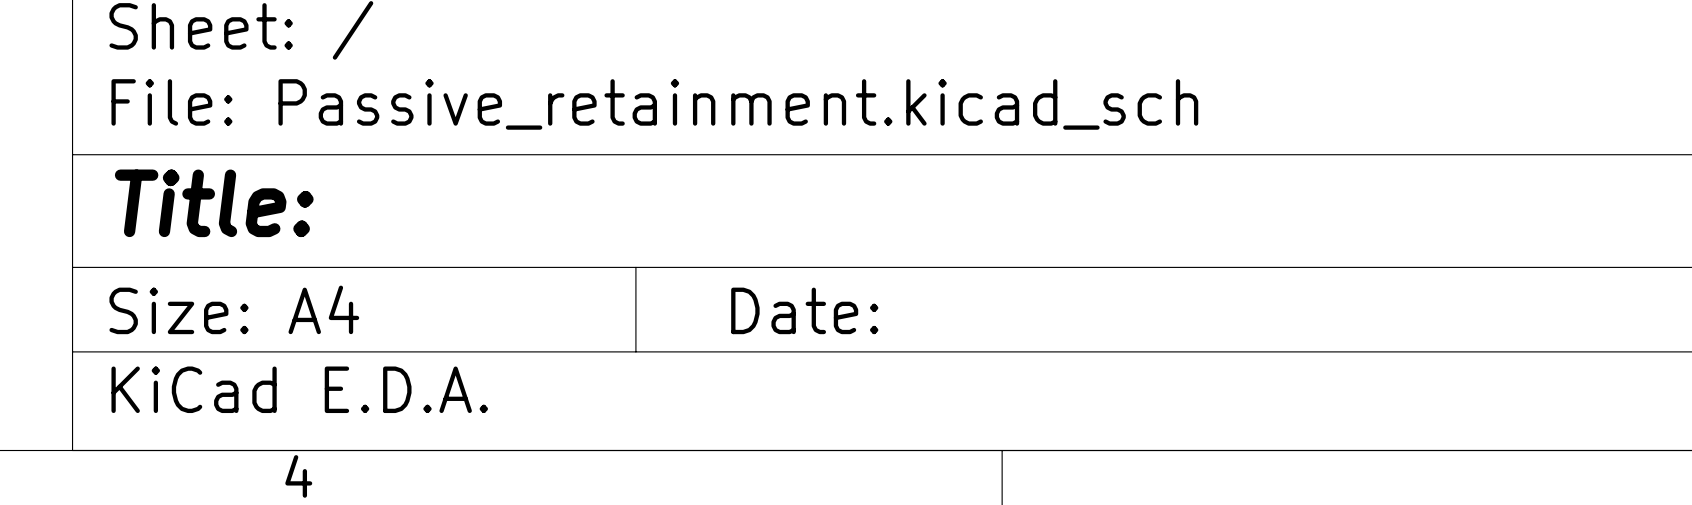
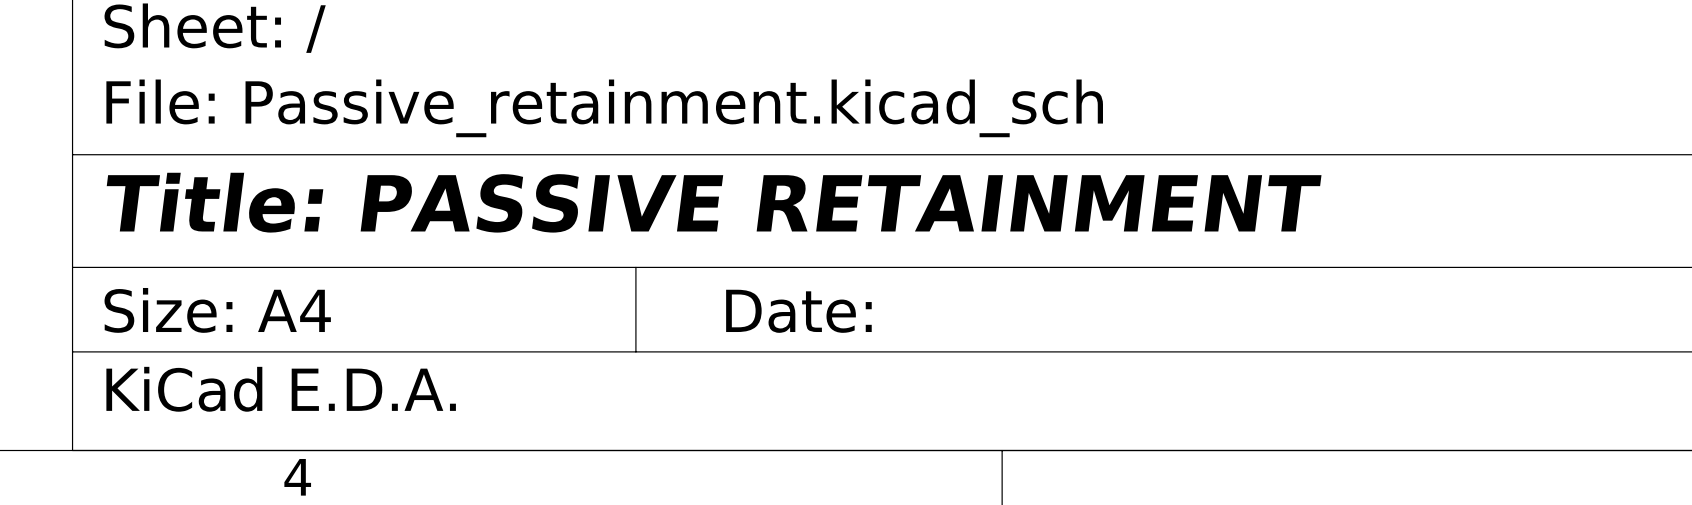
title block: Title: (214, 203) -> Title: PASSIVE RETAINMENT (714, 202)

